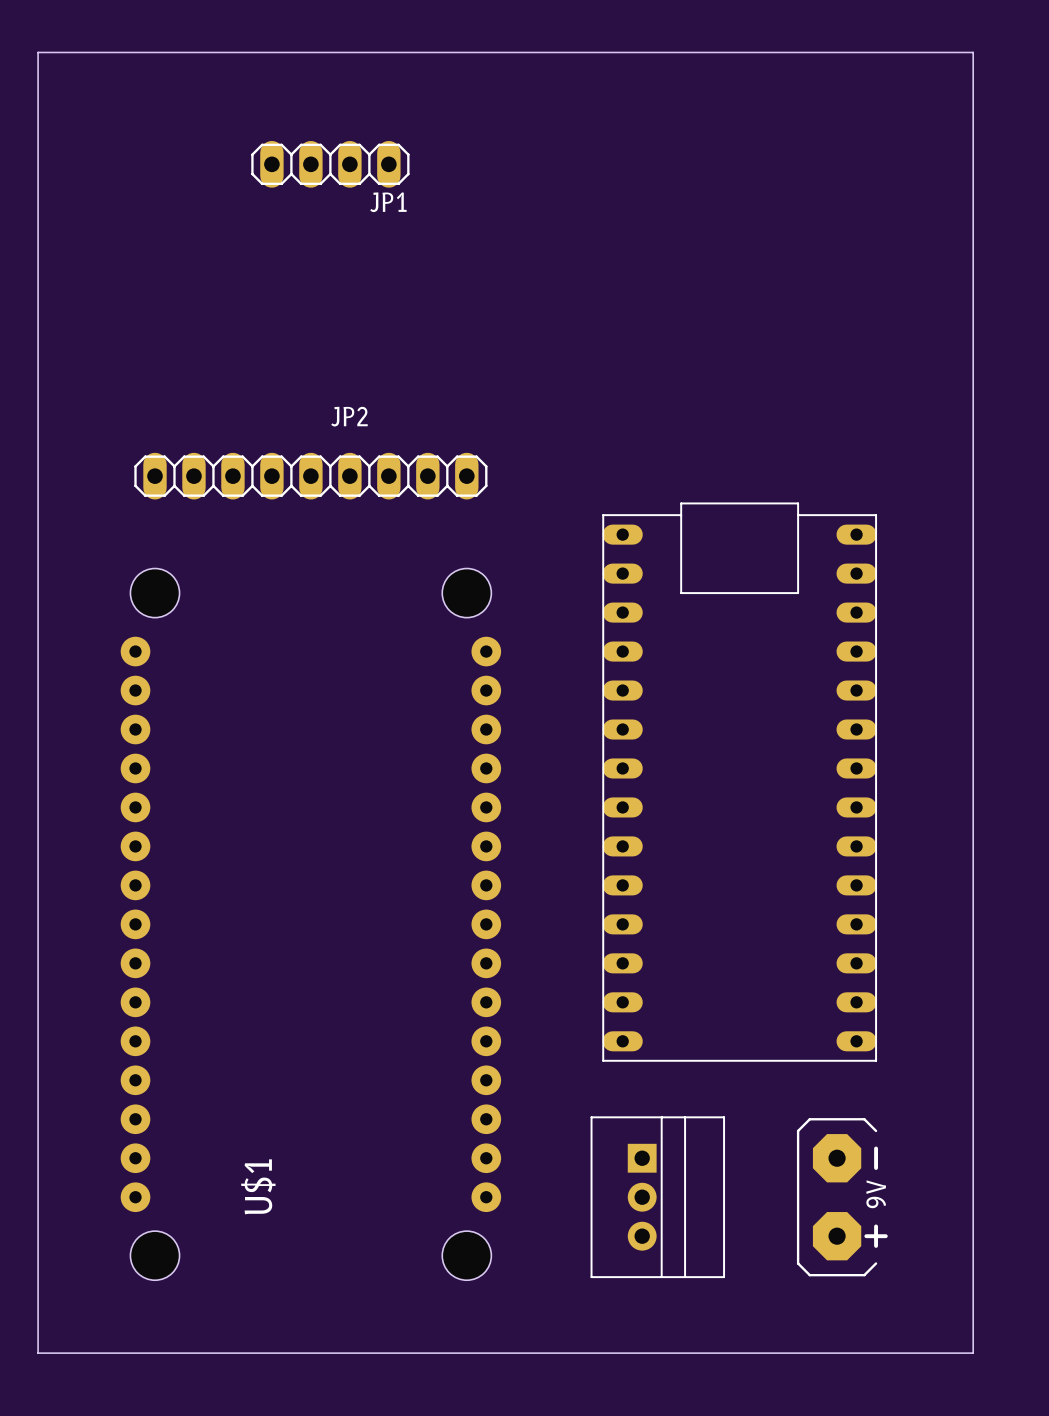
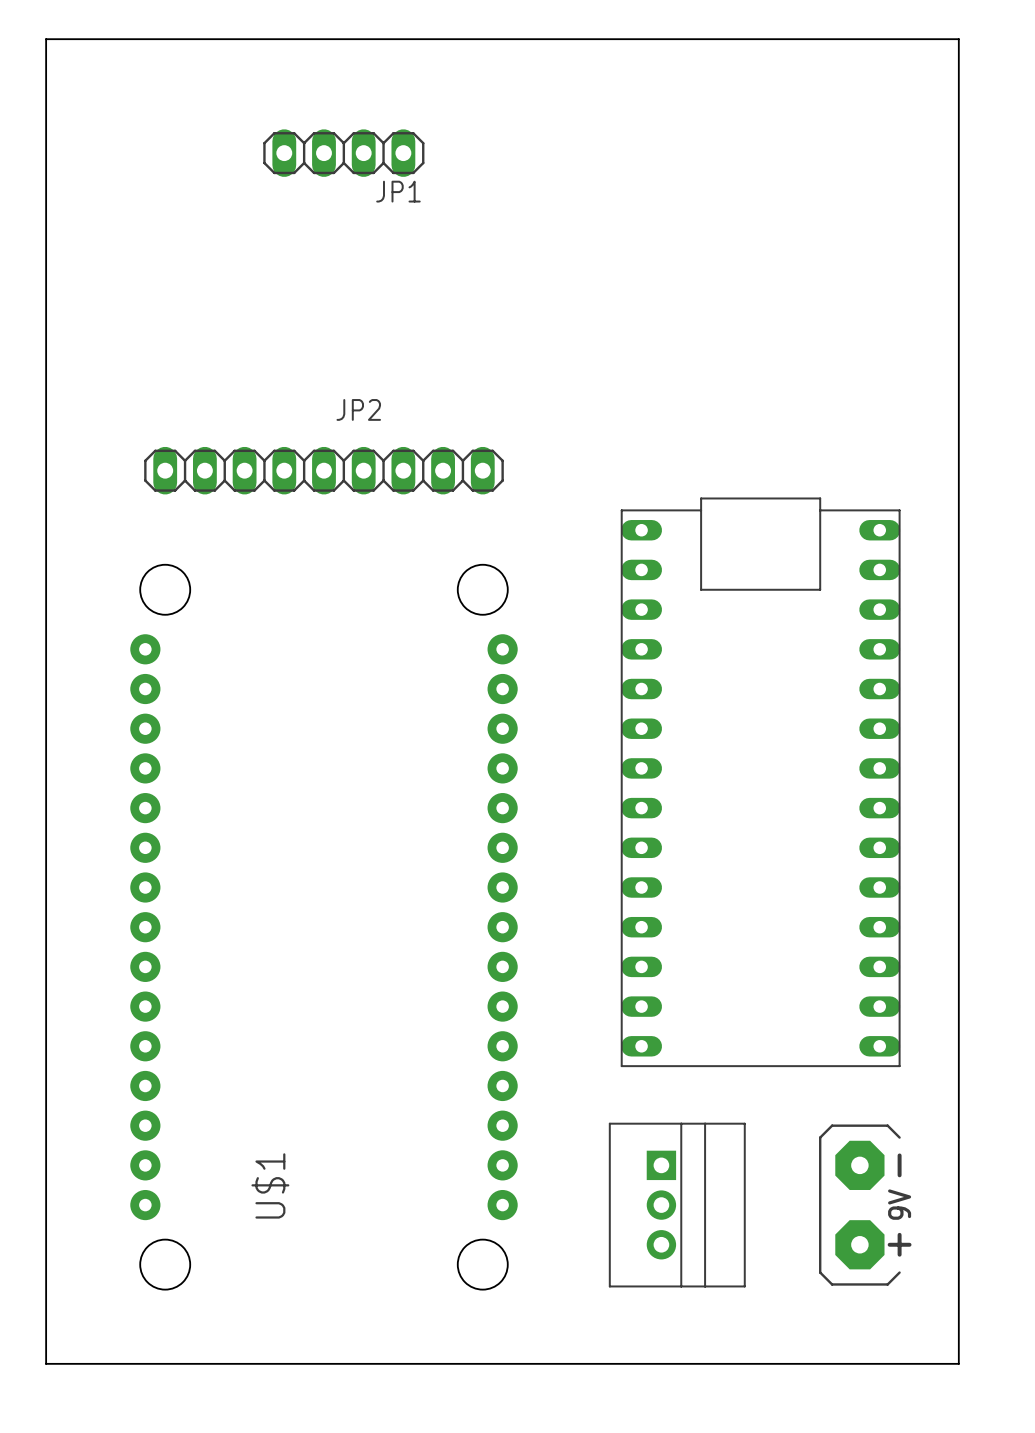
board edge: (934, 52) (973, 52) (973, 1353) (934, 1353) -> (958, 39) (958, 1363)

